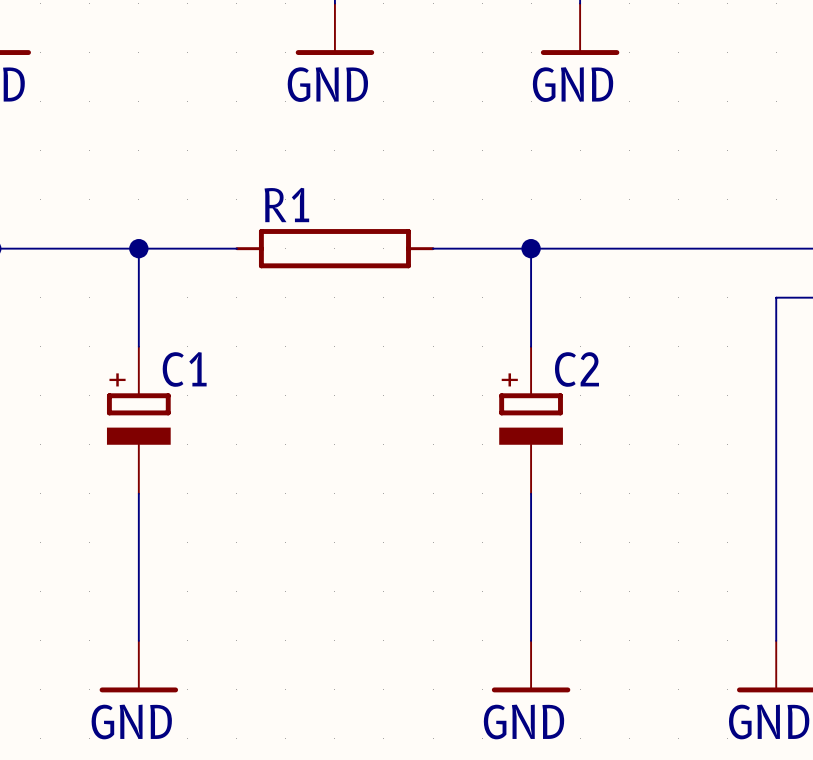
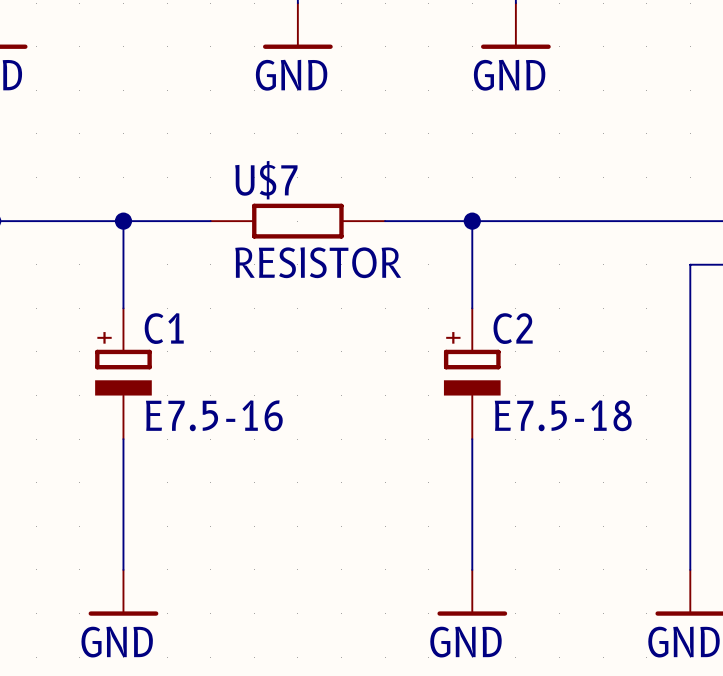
R1: (334, 248) -> none
U$7: none -> RESISTOR (297, 221)
C1 value: none -> E7.5-16 (214, 415)
C2 value: none -> E7.5-18 (563, 415)

